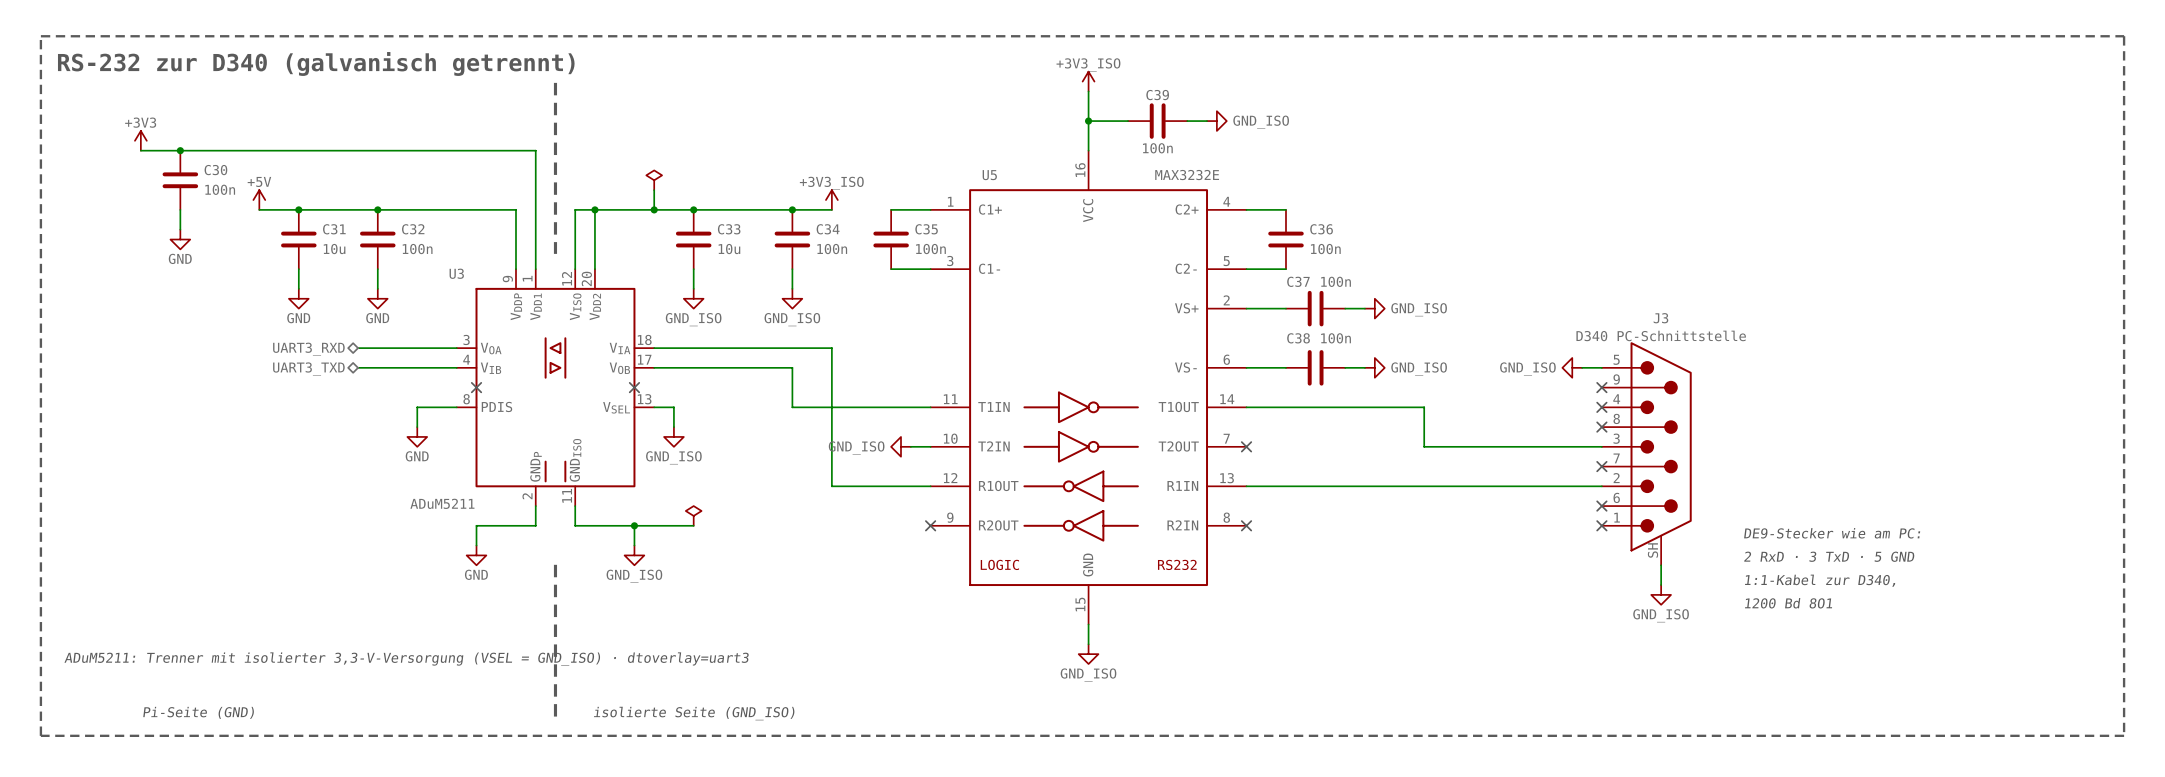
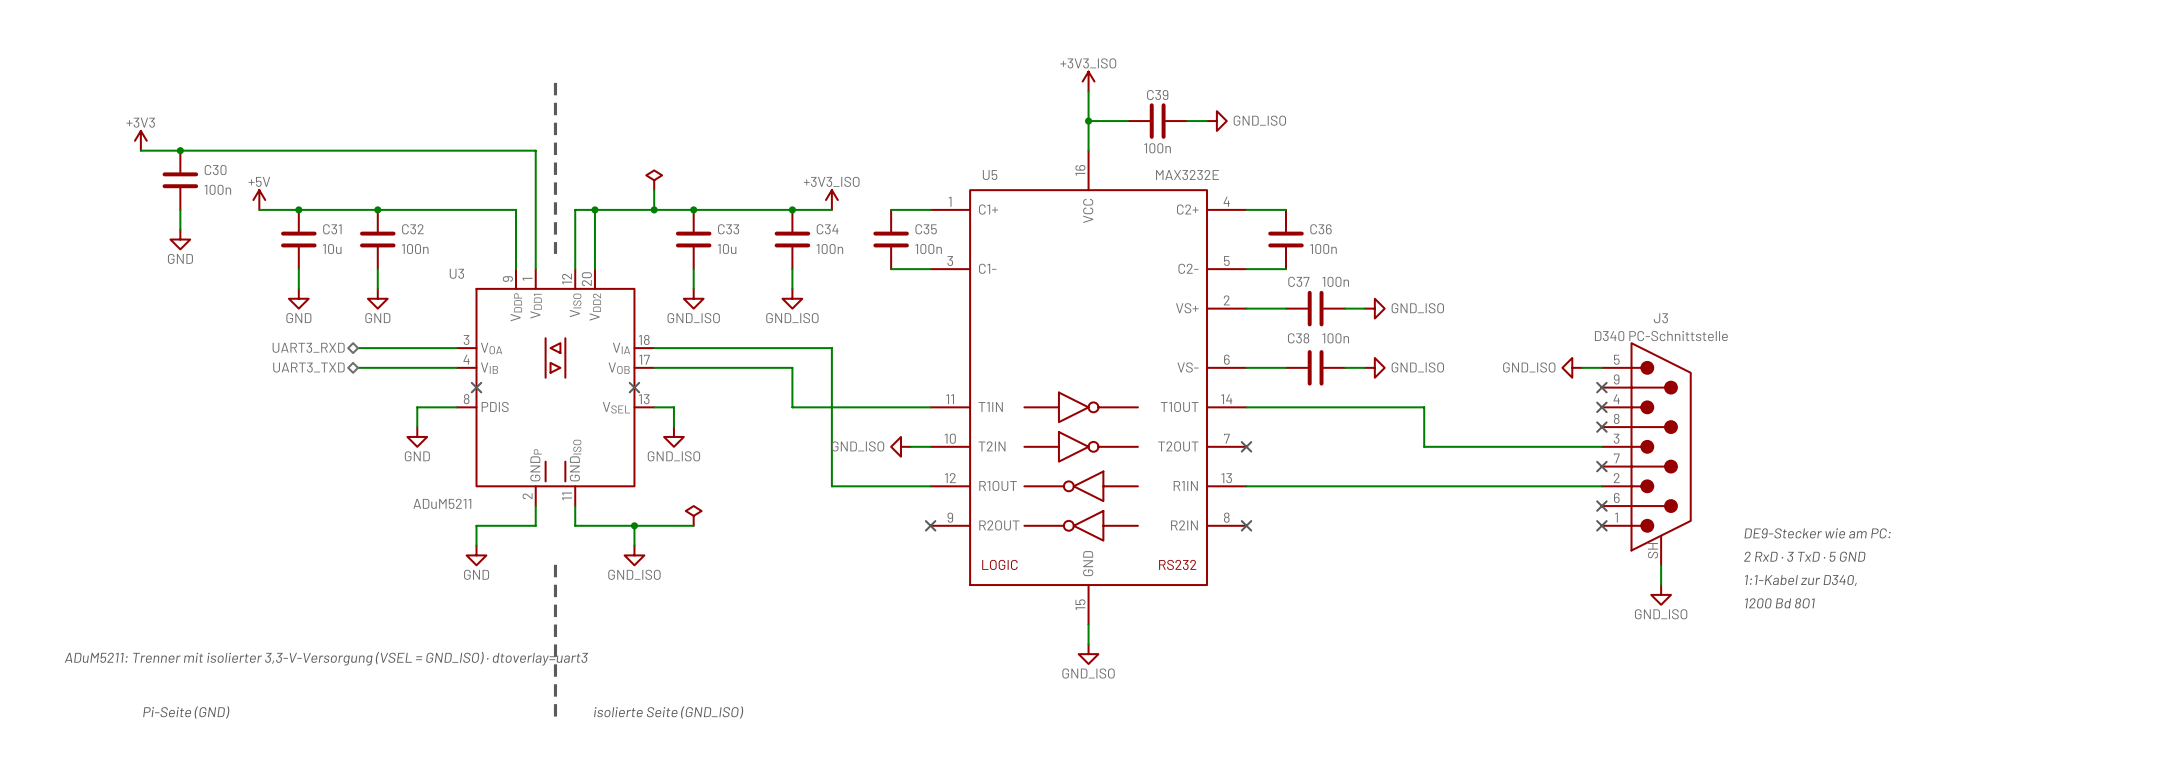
line: (40, 36) (2124, 36) (2124, 735) (40, 735) (40, 36) -> none
text: RS-232 zur D340 (galvanisch getrennt) (316, 63) -> none

